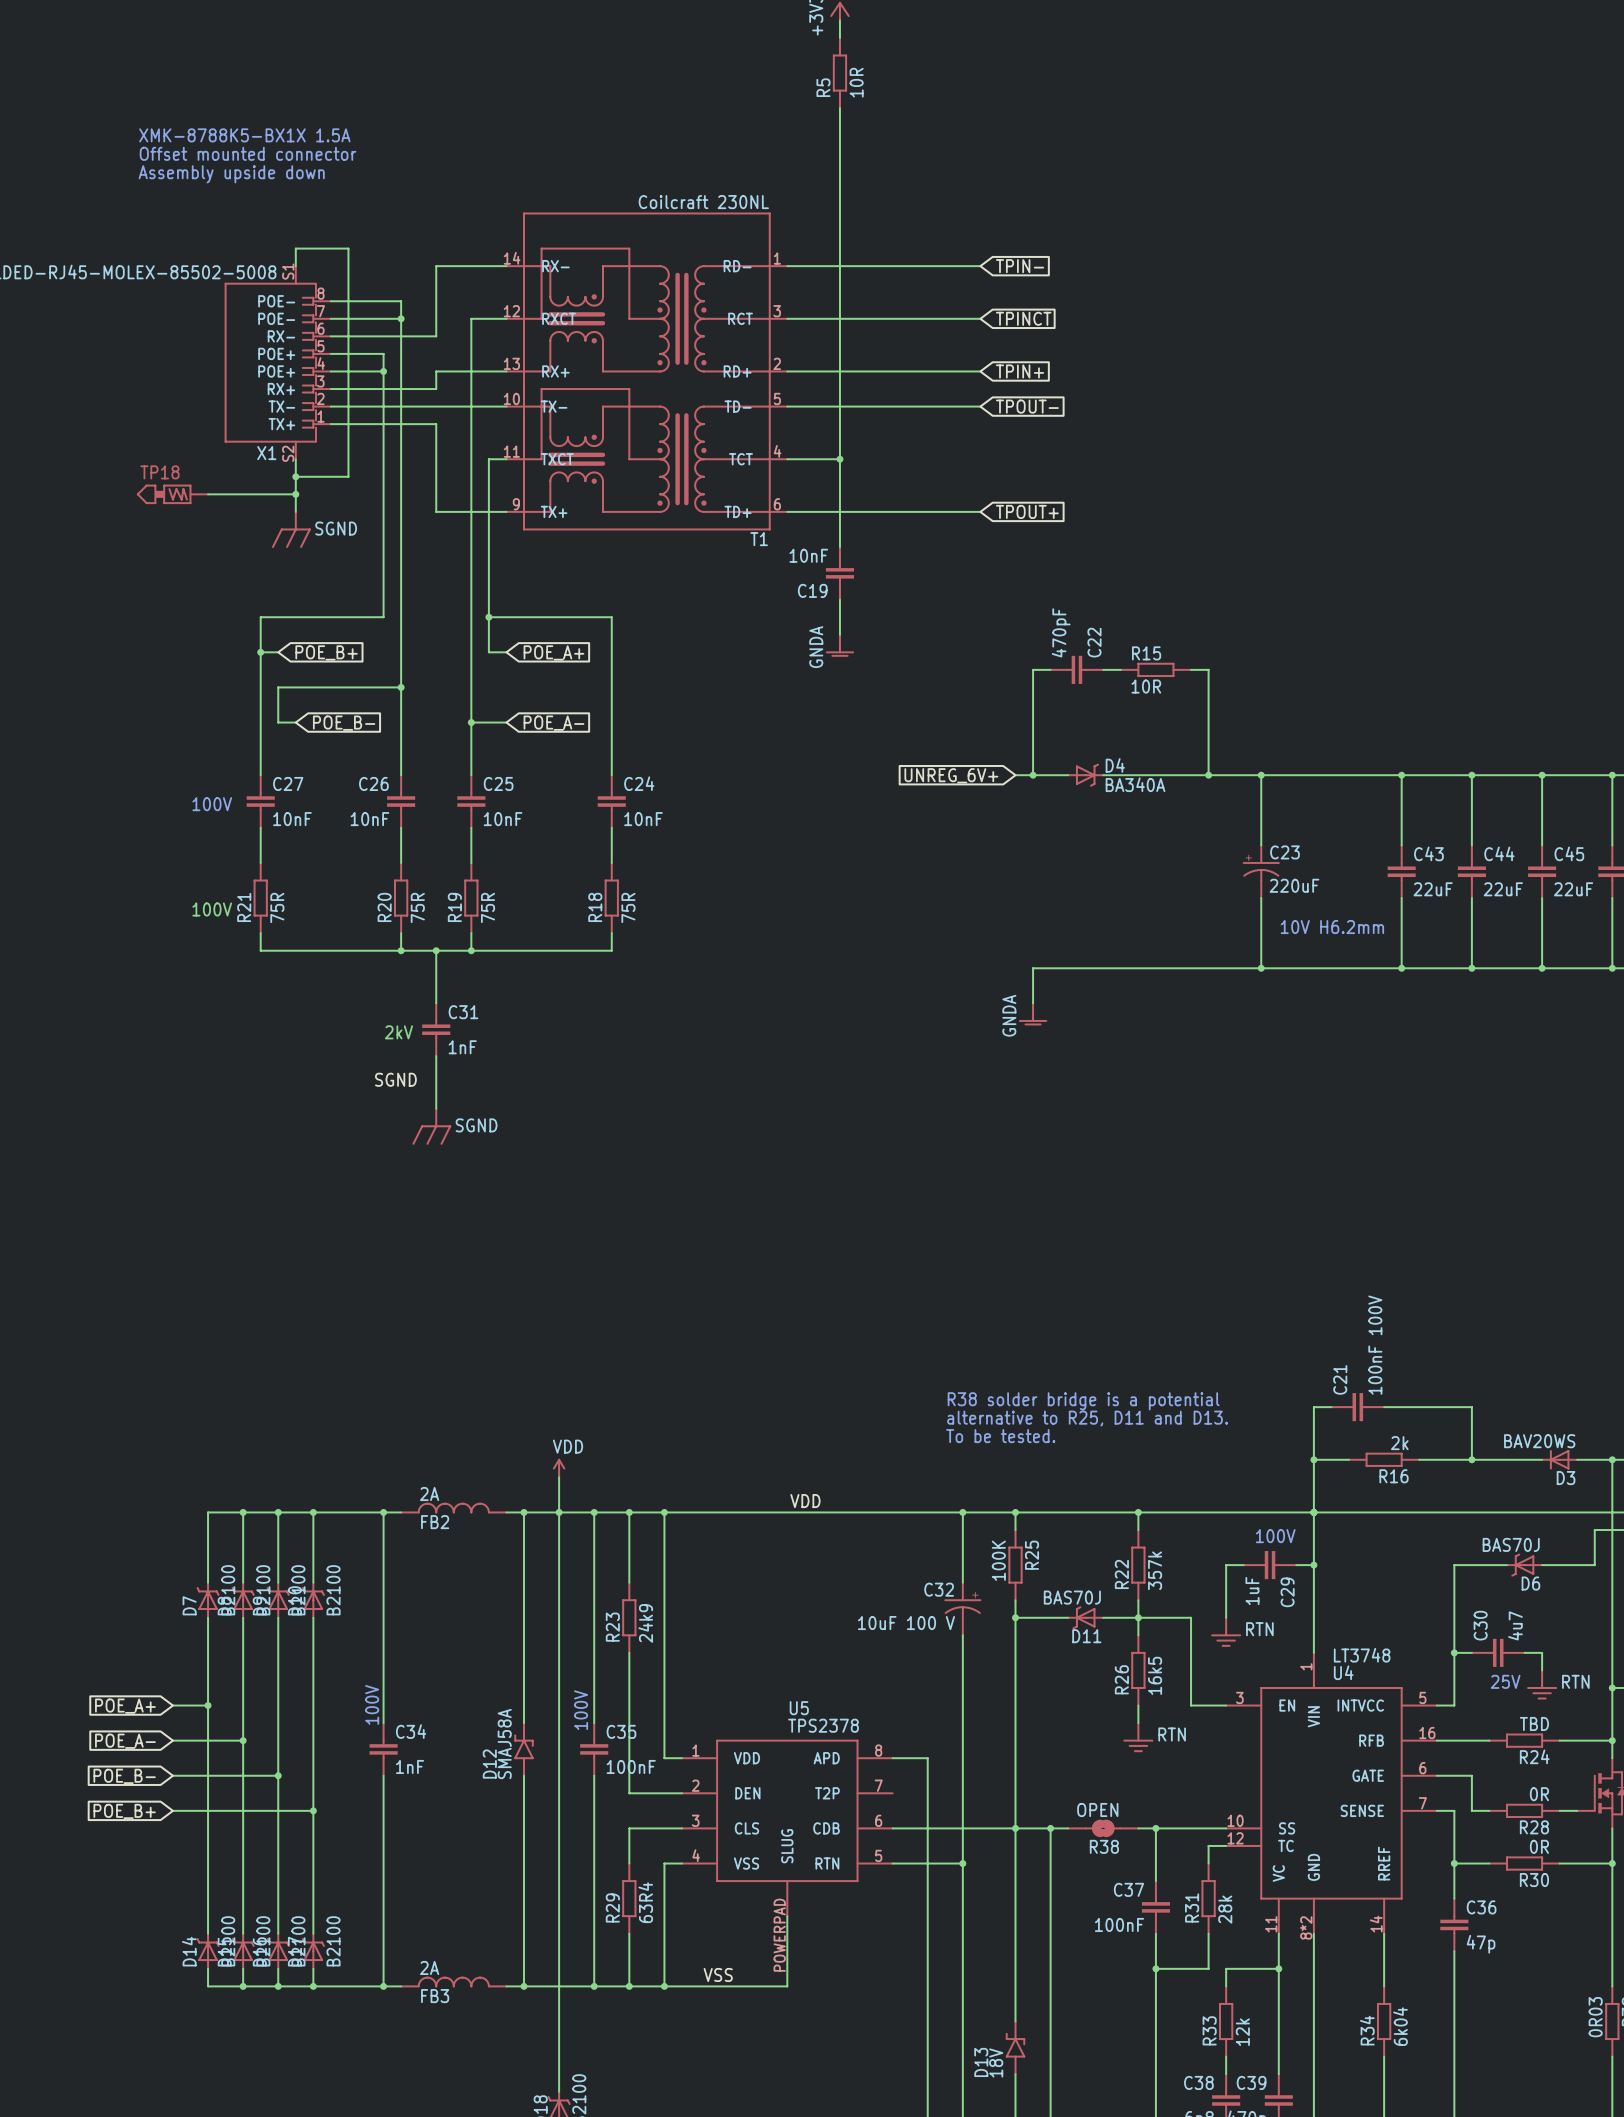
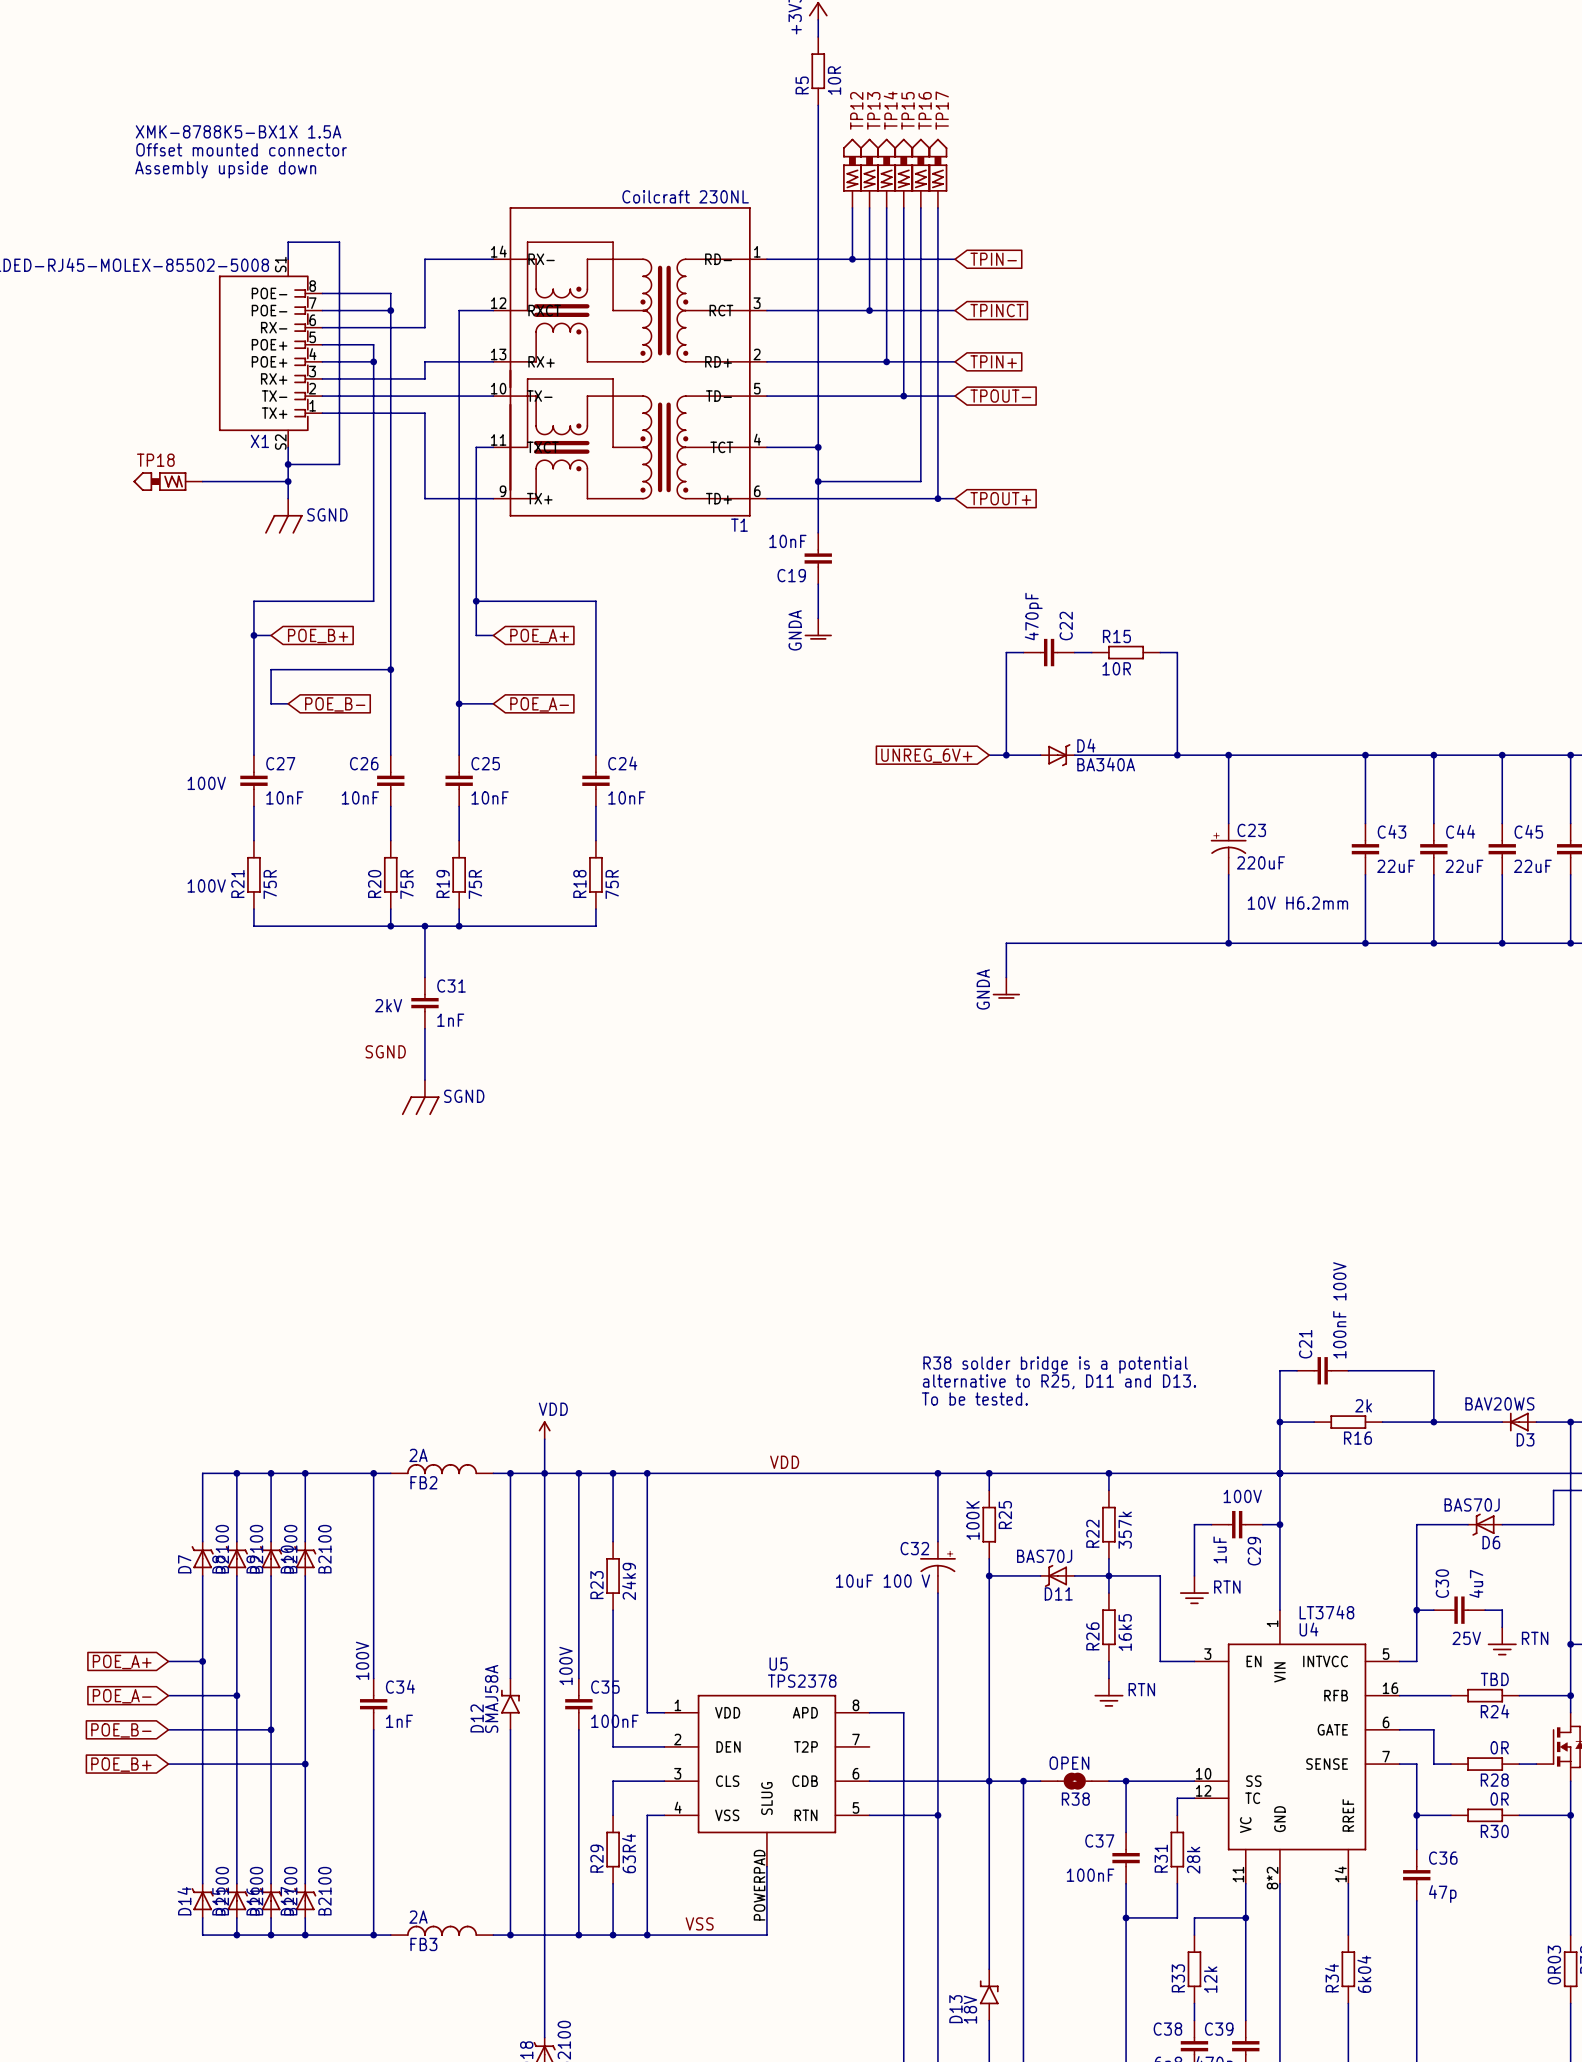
TP12: none -> (852, 173)
TP13: none -> (869, 173)
TP14: none -> (886, 173)
TP15: none -> (903, 173)
TP16: none -> (920, 173)
TP17: none -> (937, 173)
wire: none -> (852, 207) (852, 259)
wire: none -> (869, 207) (869, 310)
wire: none -> (886, 207) (886, 361)
wire: none -> (903, 207) (903, 396)
wire: none -> (920, 207) (920, 481) (818, 481)
wire: none -> (937, 207) (937, 498)
junction: none -> (852, 259)
junction: none -> (869, 310)
junction: none -> (886, 361)
junction: none -> (903, 396)
junction: none -> (818, 481)
junction: none -> (937, 498)

